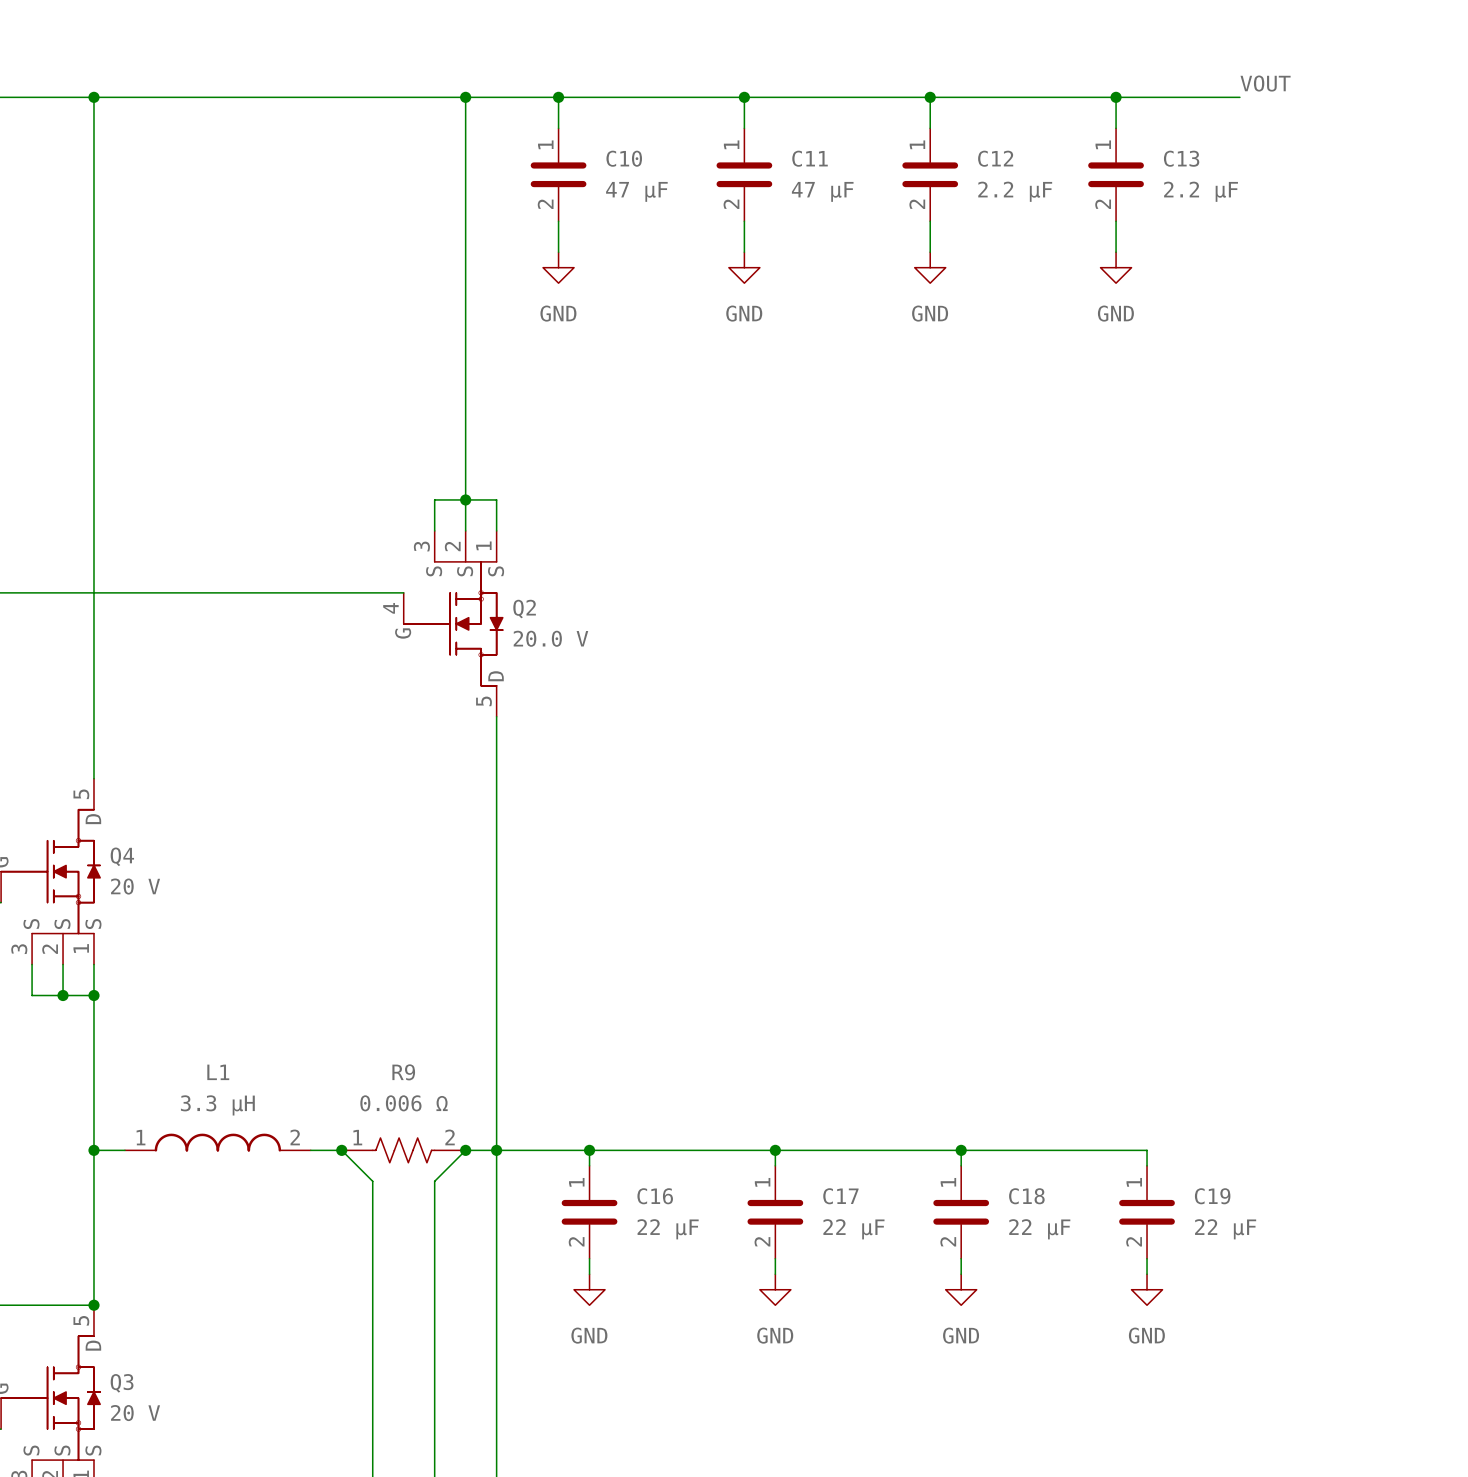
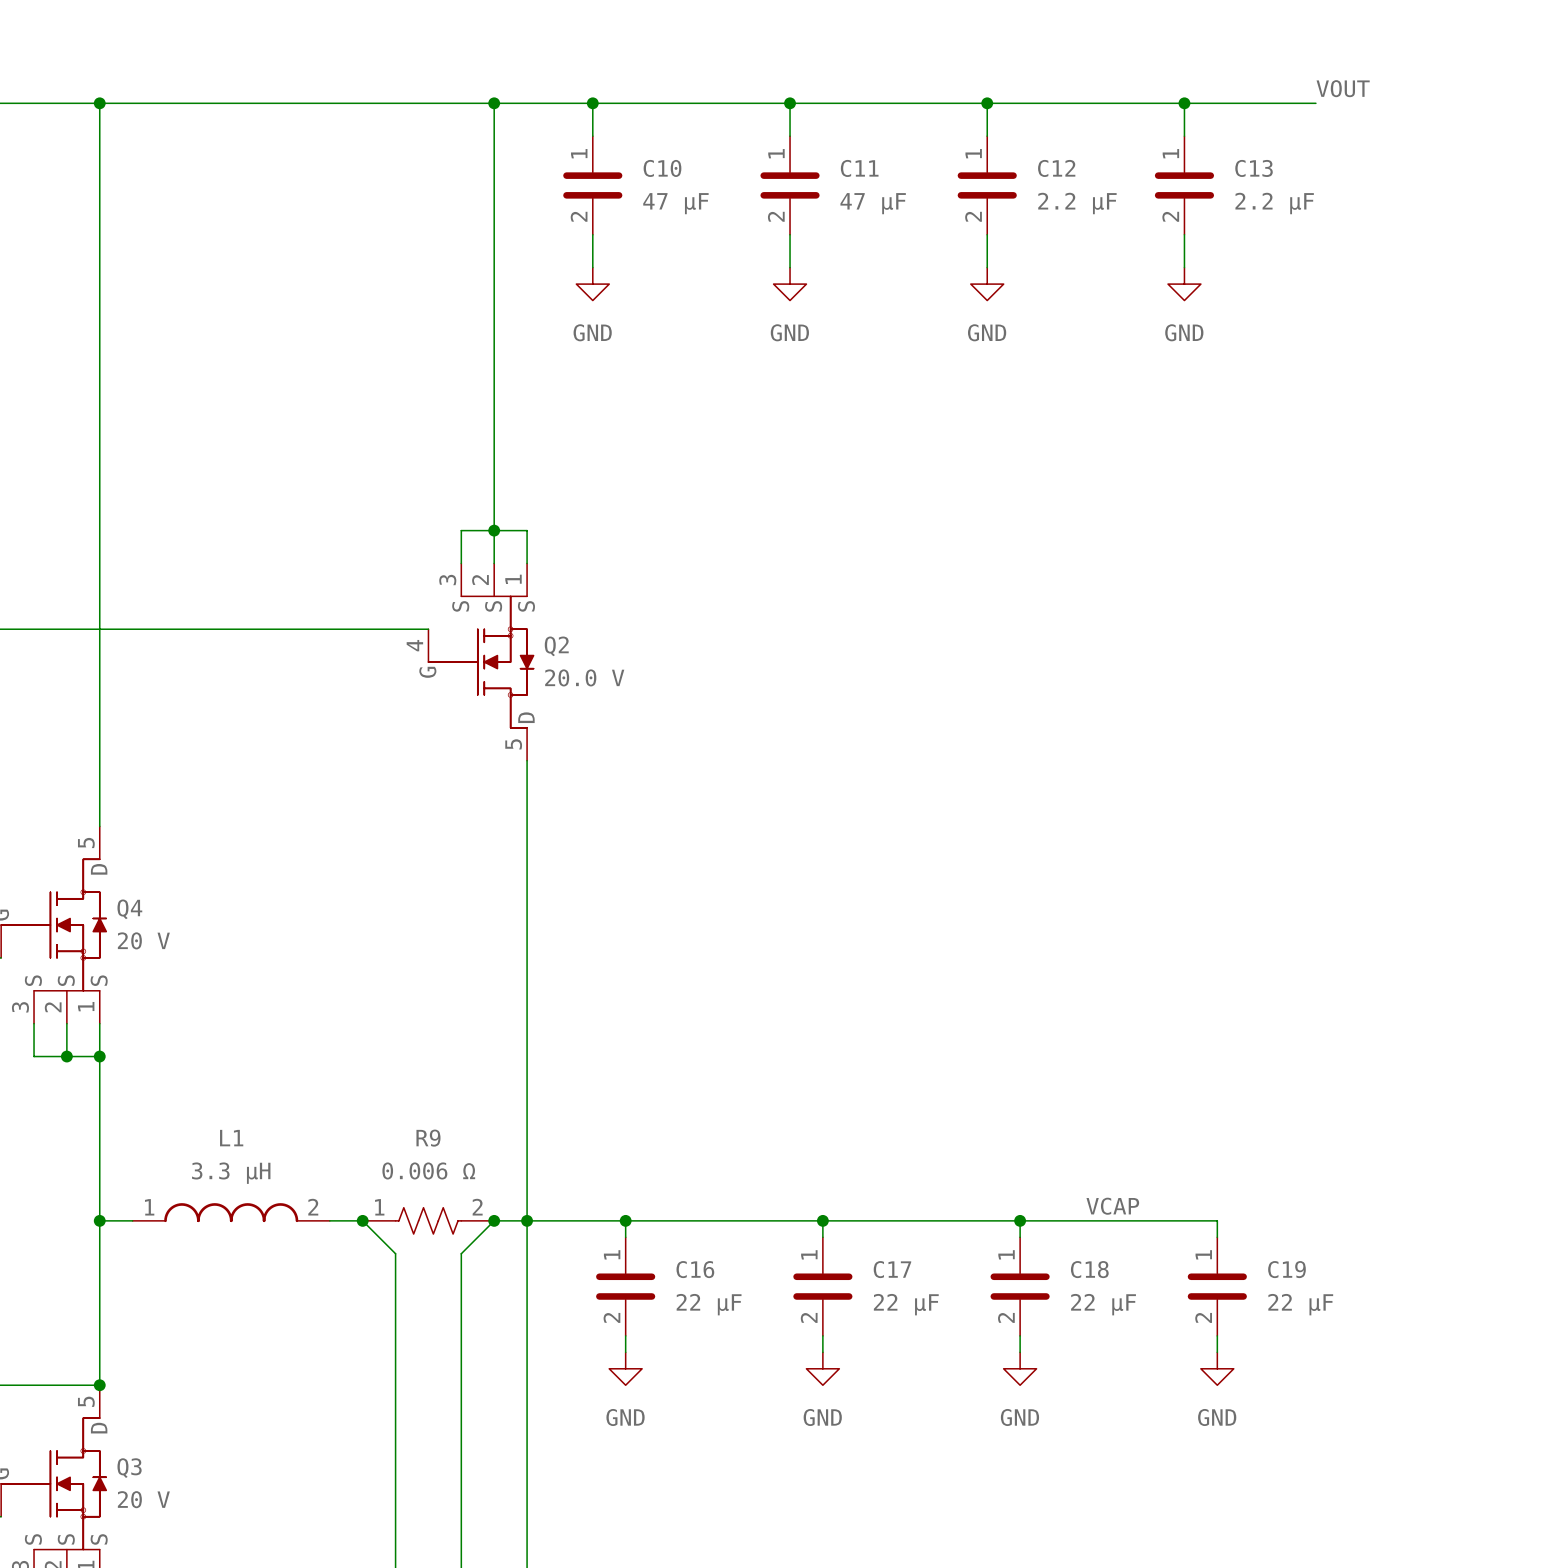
label: none -> VCAP (1112, 1206)

